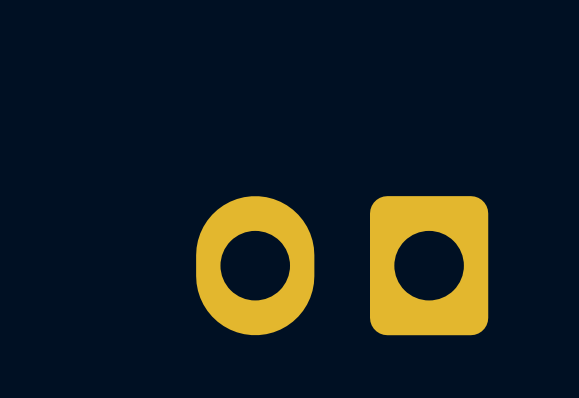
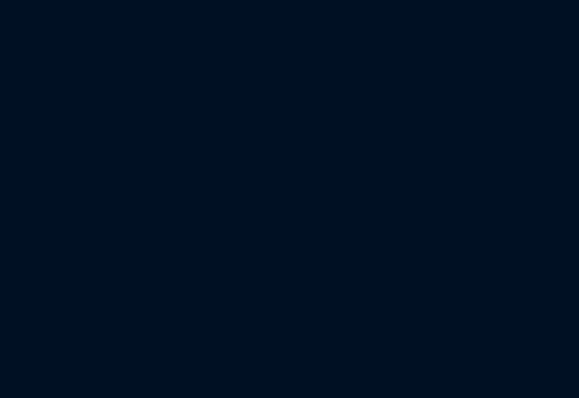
part: (342, 265) -> none

